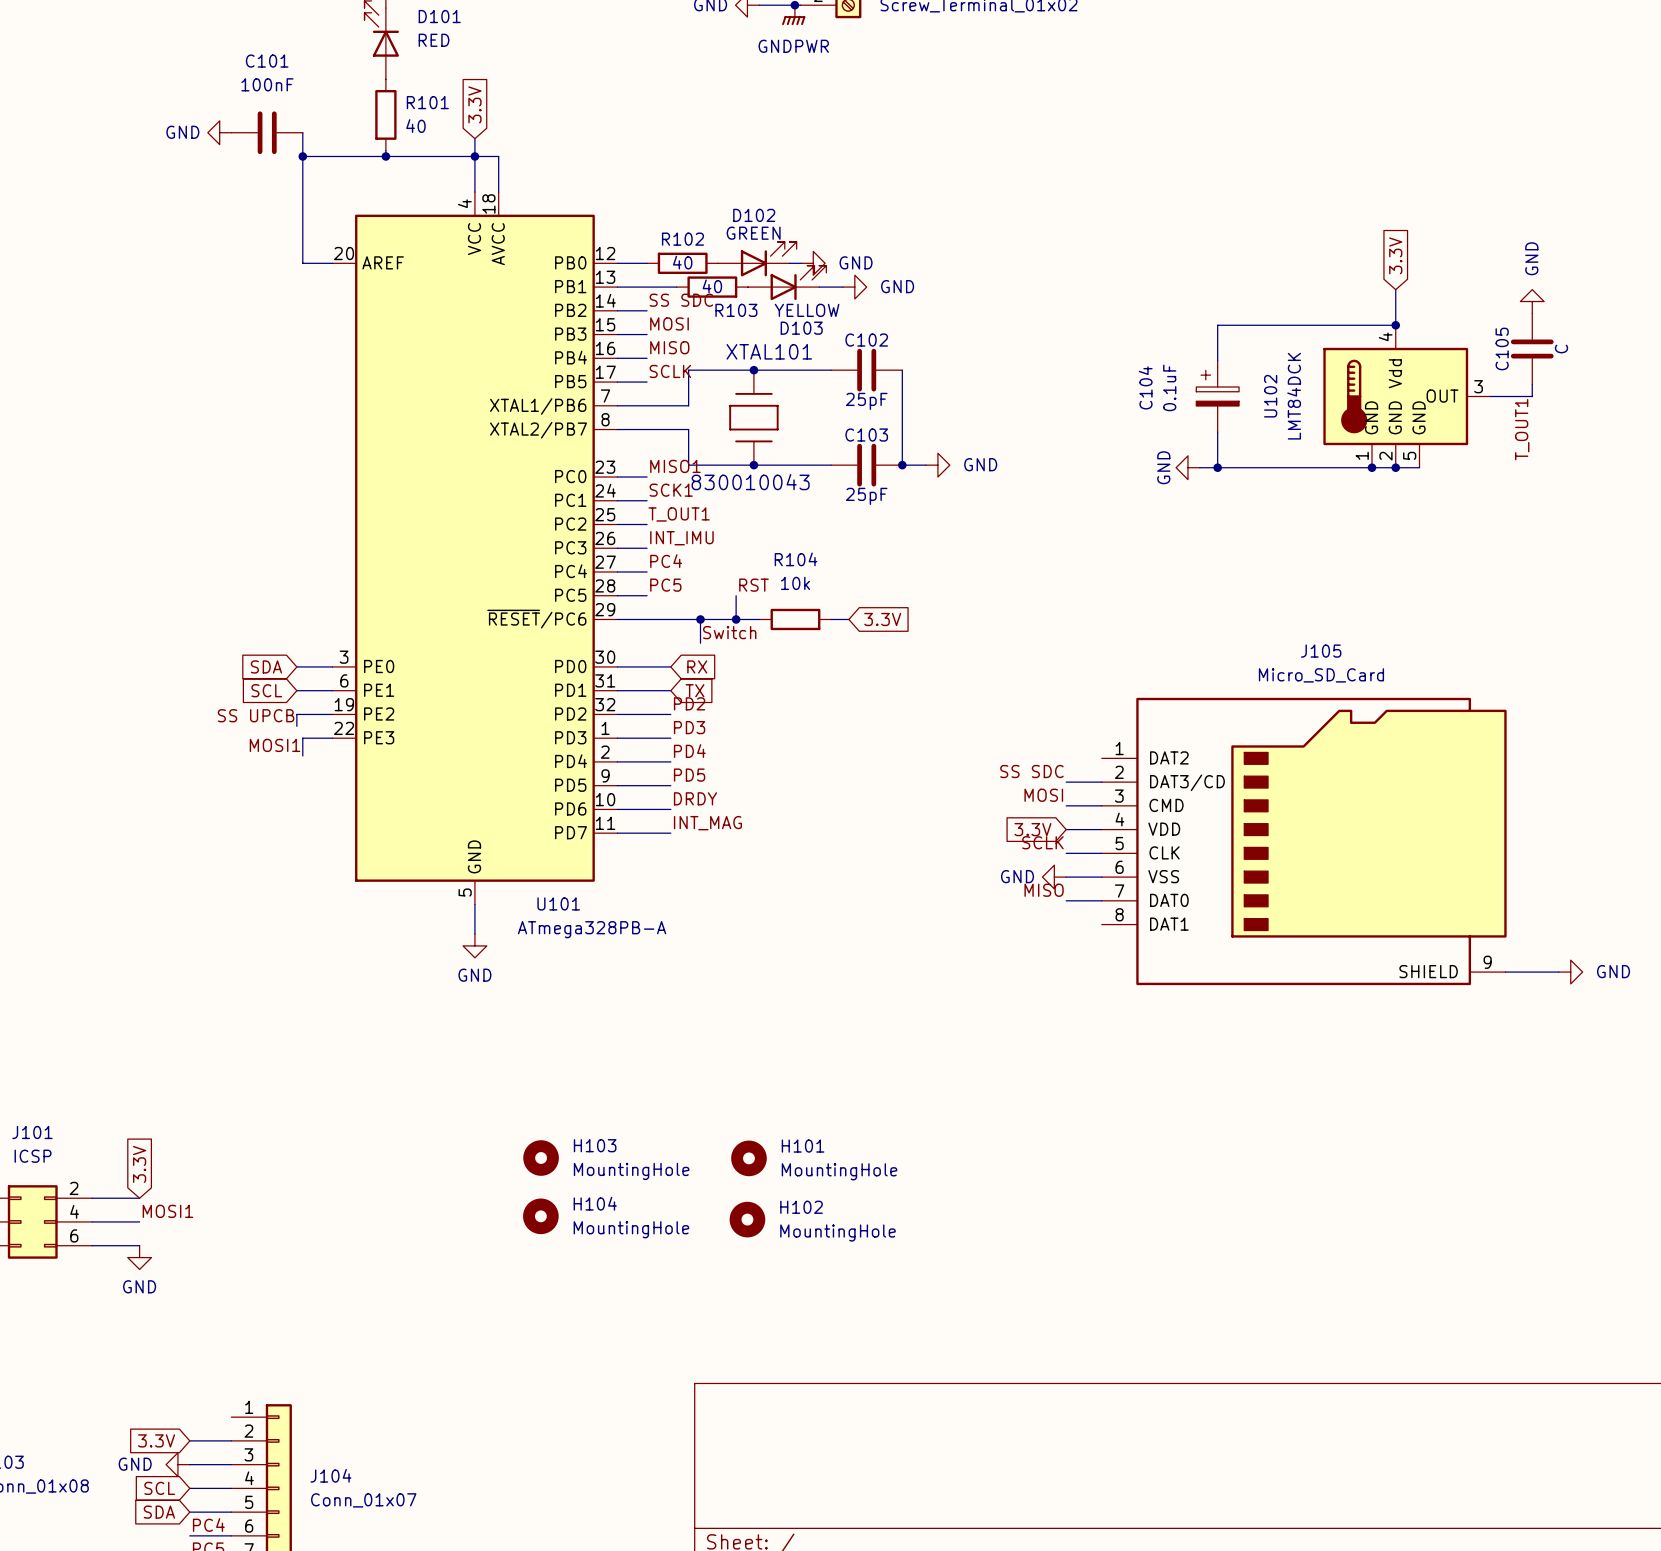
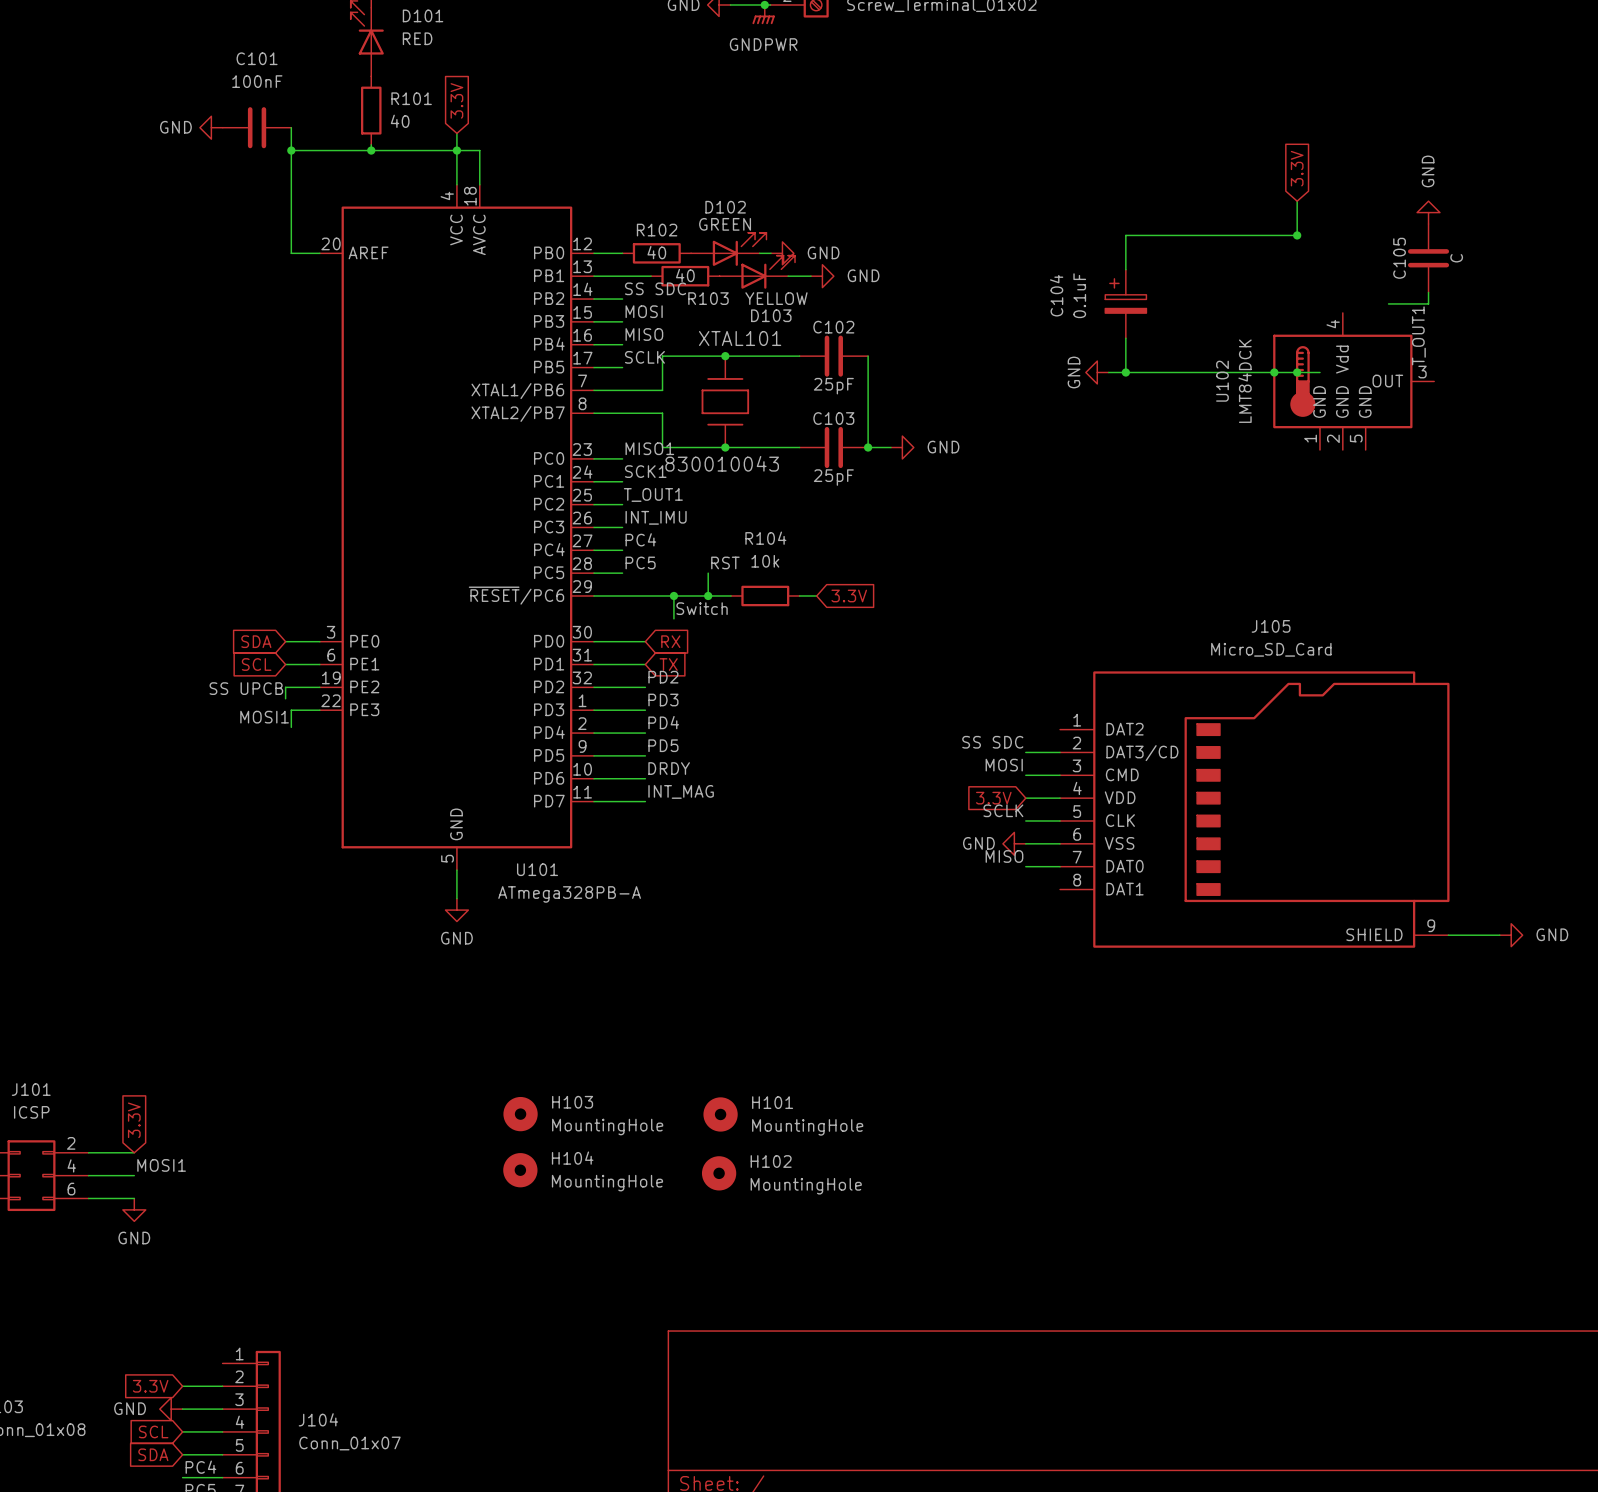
junction: none -> (1297, 235)
global label position: 3.3V (1395, 255) -> 3.3V (1297, 168)
wire: (1395, 289) (1395, 325) (1217, 325) (1217, 360) -> (1297, 201) (1297, 235) (1125, 235) (1125, 269)
power symbol position: GND (1532, 301) -> GND (1428, 212)
junction: (1395, 325) -> none
C105 position: (1532, 349) -> (1428, 258)
wire: (1532, 384) (1532, 396) (1490, 396) -> (1428, 292) (1428, 303) (1388, 303)
junction: none -> (1125, 372)
junction: none -> (1274, 372)
junction: none -> (1297, 372)
C104 position: (1217, 396) -> (1125, 303)
label position: T_OUT1 (1522, 429) -> T_OUT1 (1418, 335)
wire: (1217, 432) (1217, 467) -> (1125, 338) (1125, 372)
power symbol position: GND (1187, 467) -> GND (1097, 372)
wire: (1199, 467) (1419, 467) -> (1108, 372) (1320, 372)
junction: (1217, 467) -> none
junction: (1372, 467) -> none
junction: (1395, 467) -> none

